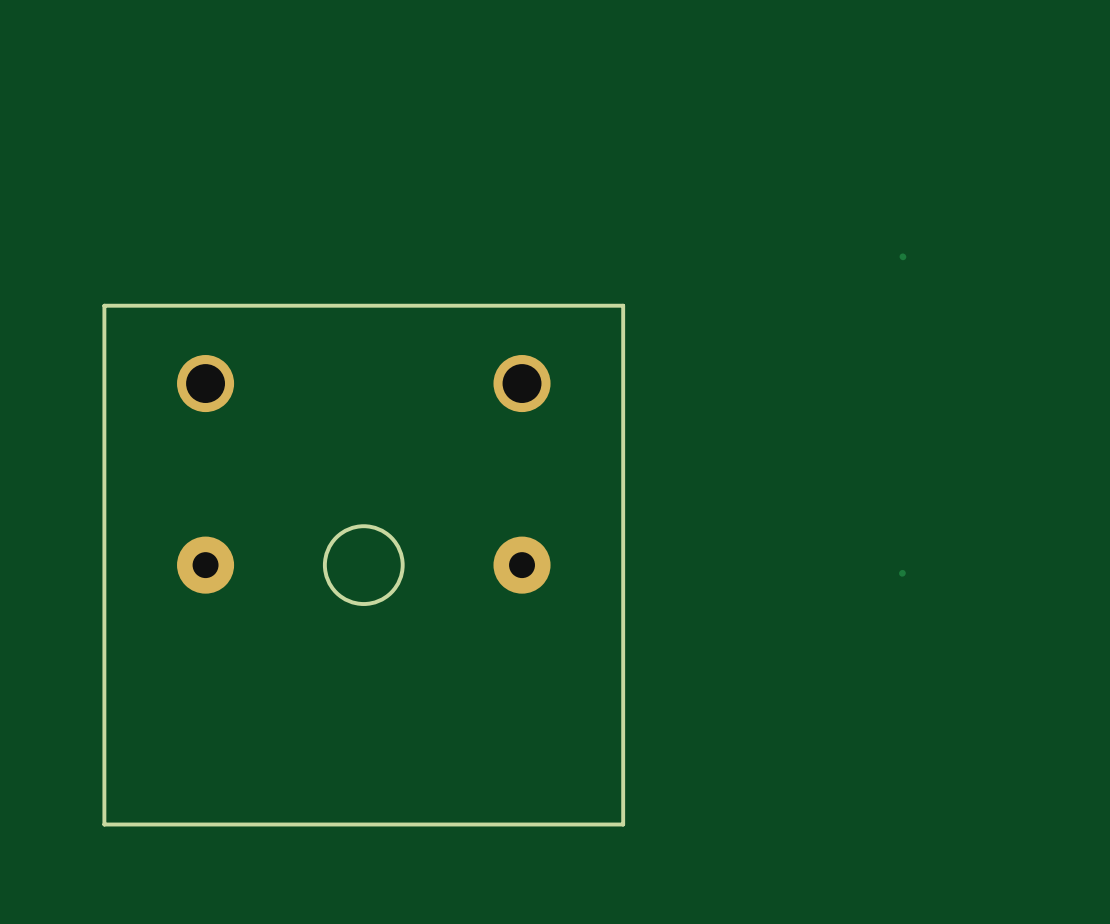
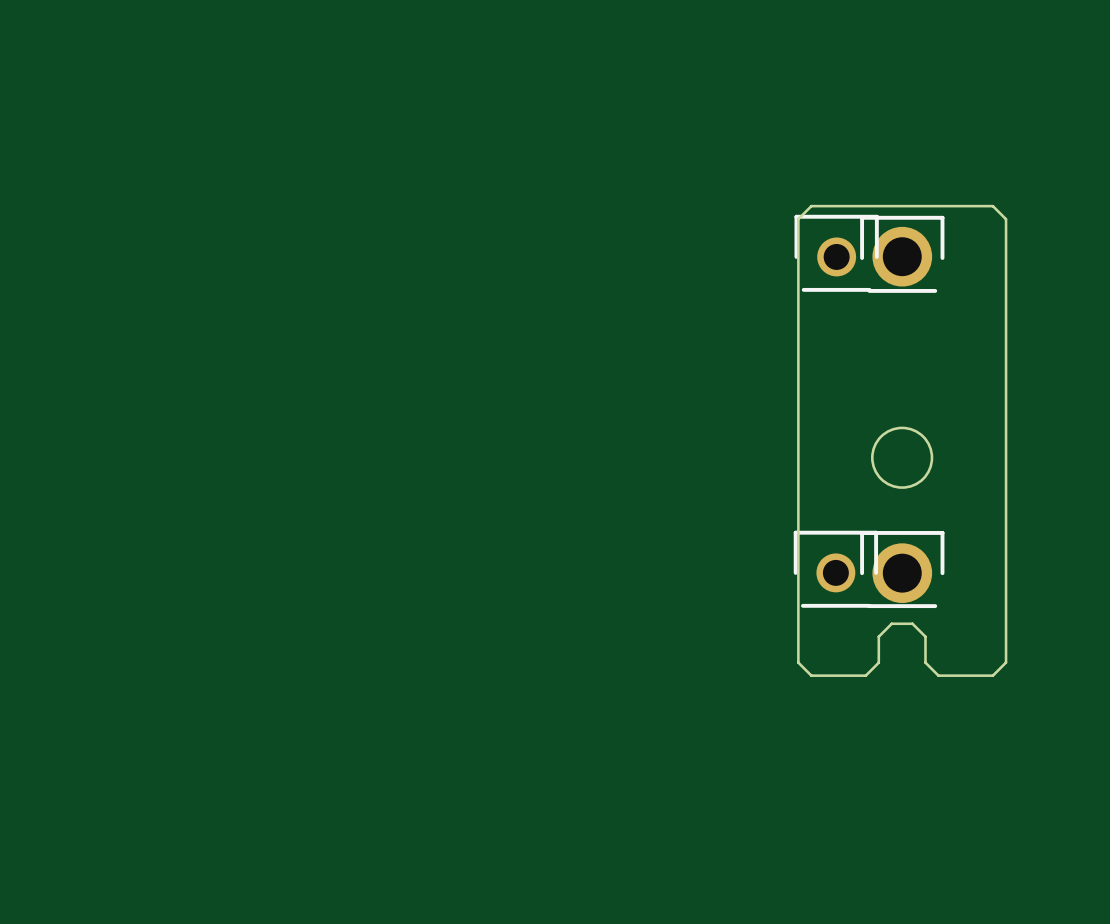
board edge: none -> (1005, 219) (992, 206) (811, 206) (798, 219) (798, 662) (811, 675) (865, 675) (878, 662) (878, 636) (891, 623) (912, 623) (925, 636) (925, 662) (938, 675) (992, 675) (1005, 662)
board edge: none -> (1006, 219) (1006, 662)
part: none -> (836, 253)
part: none -> (902, 254)
board edge: (104, 305) (623, 305) (623, 824) (104, 824) (104, 305) -> none
part: (205, 383) -> none
part: (522, 383) -> none
round board edge: none -> [871, 426, 934, 489]
round board edge: [322, 524, 405, 606] -> none
part: (205, 565) -> none
part: (522, 565) -> none
part: none -> (835, 569)
part: none -> (902, 569)

